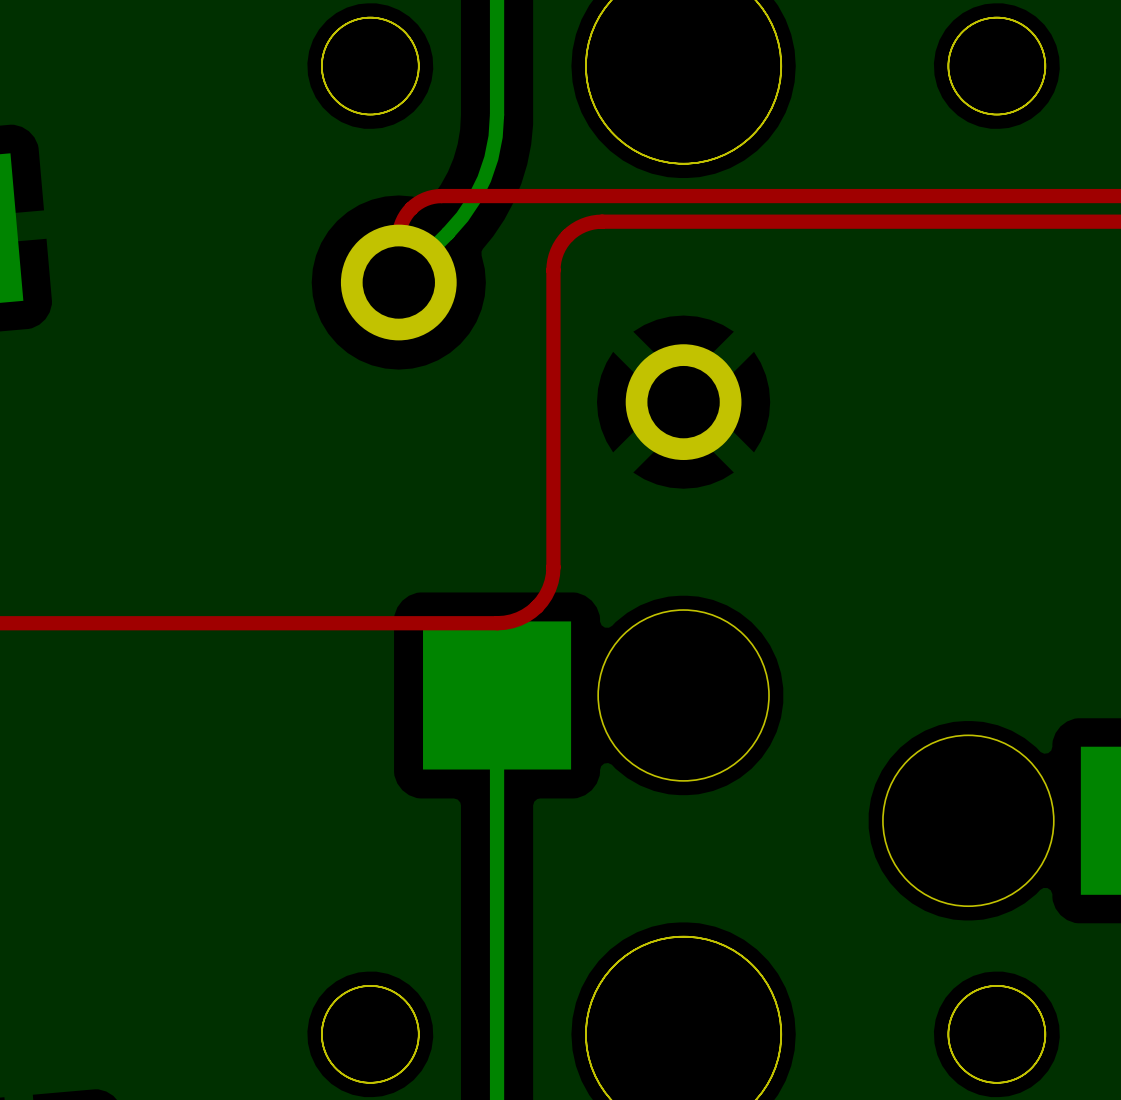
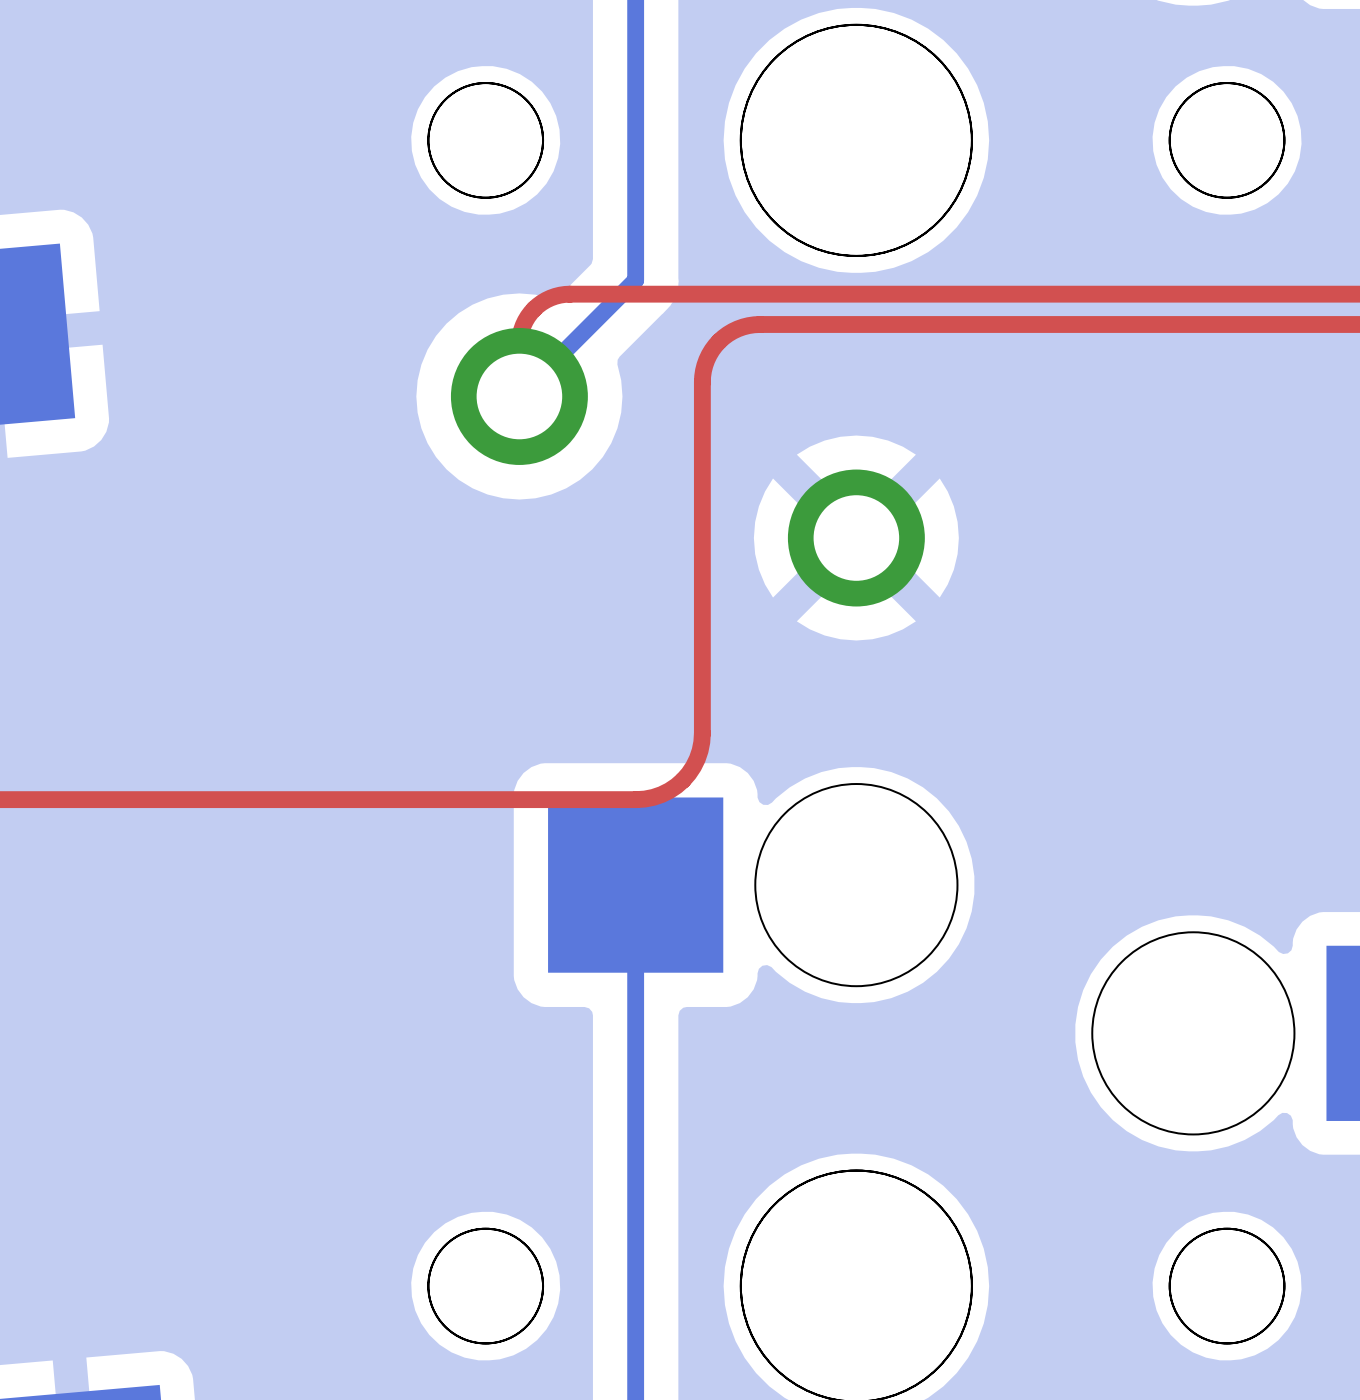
bottom track: (497, 114) (491, 158) (484, 178) (462, 216) (447, 233) -> (635, 198) (635, 280) (577, 338)

